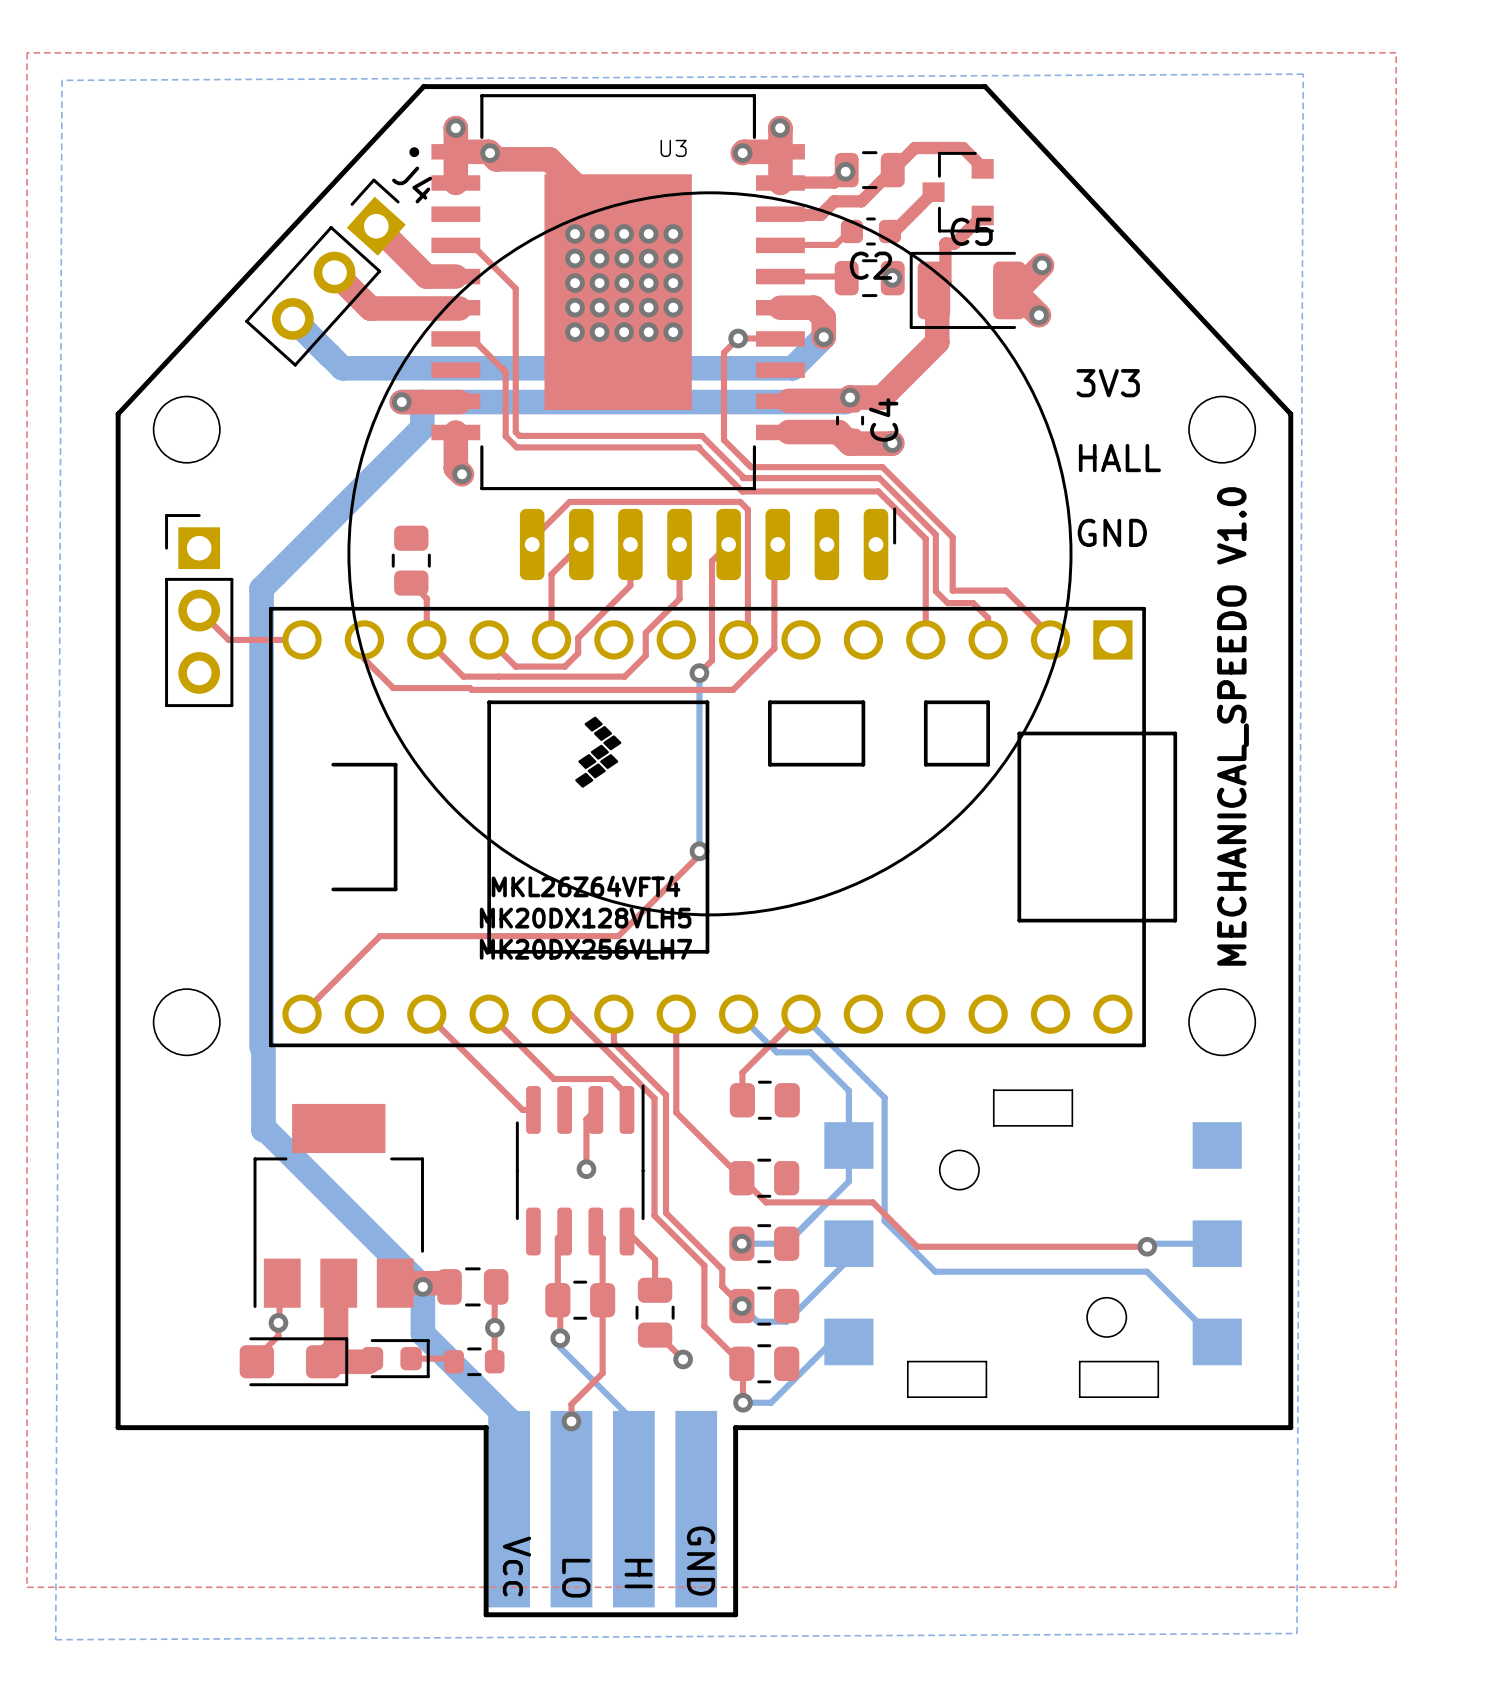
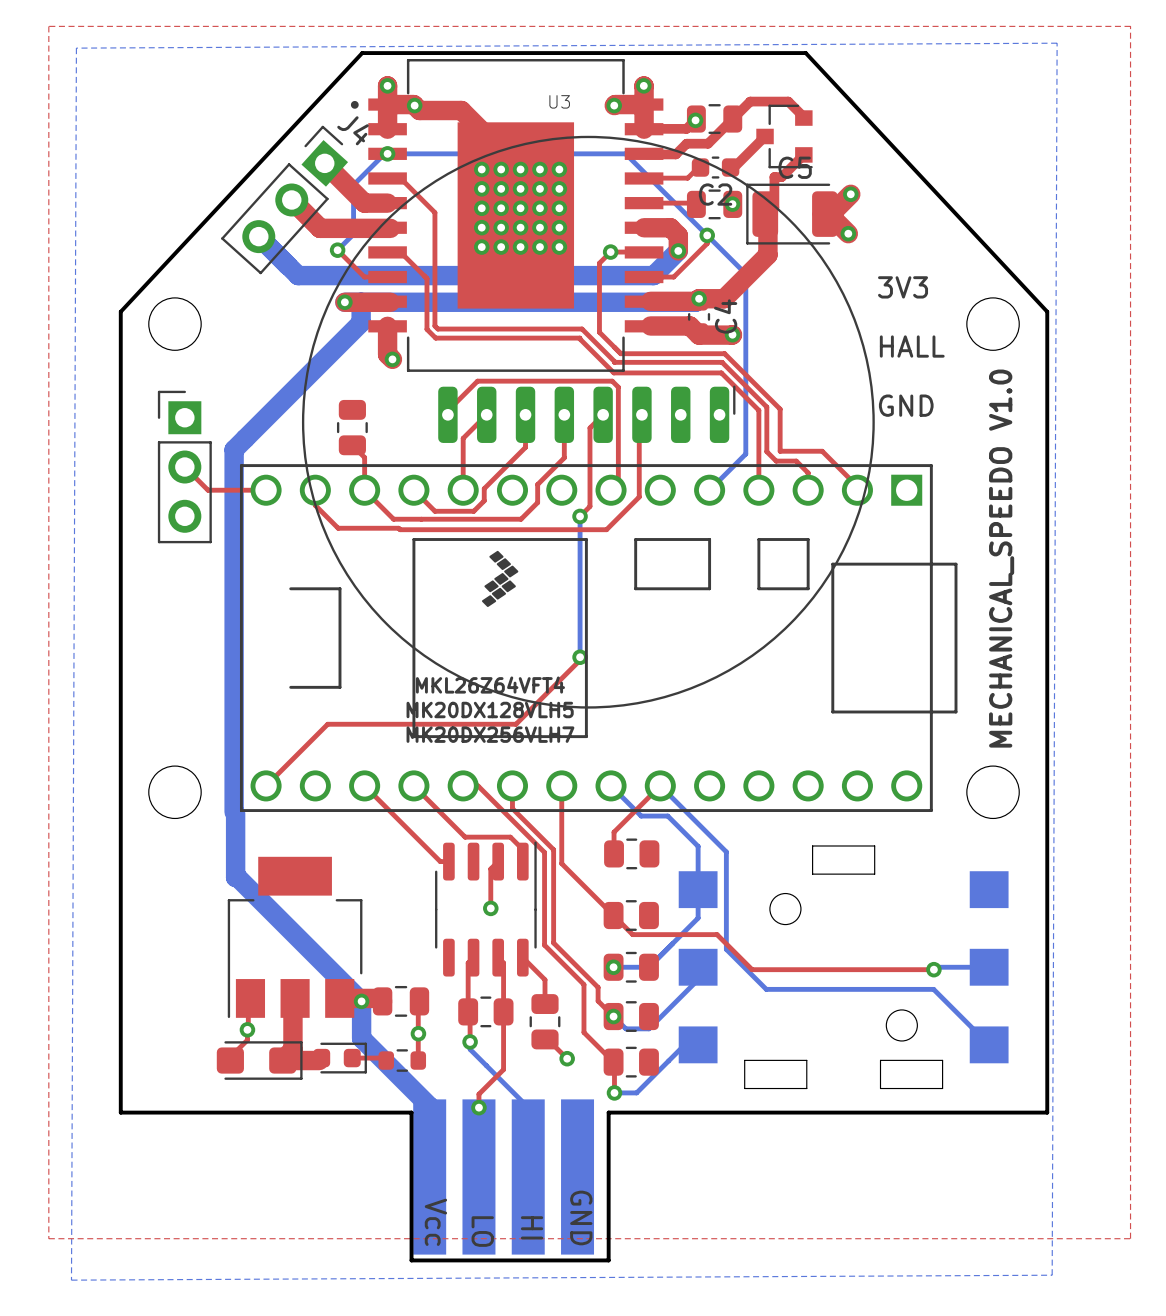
via: none -> (387, 153)
top track: none -> (707, 235) (707, 243) (673, 277) (644, 277)
via: none -> (707, 235)
top track: none -> (337, 250) (364, 277) (387, 277)
bottom track: none -> (337, 250) (353, 234) (353, 184) (384, 153) (625, 153) (745, 273) (745, 454) (709, 490)
via: none -> (337, 250)

